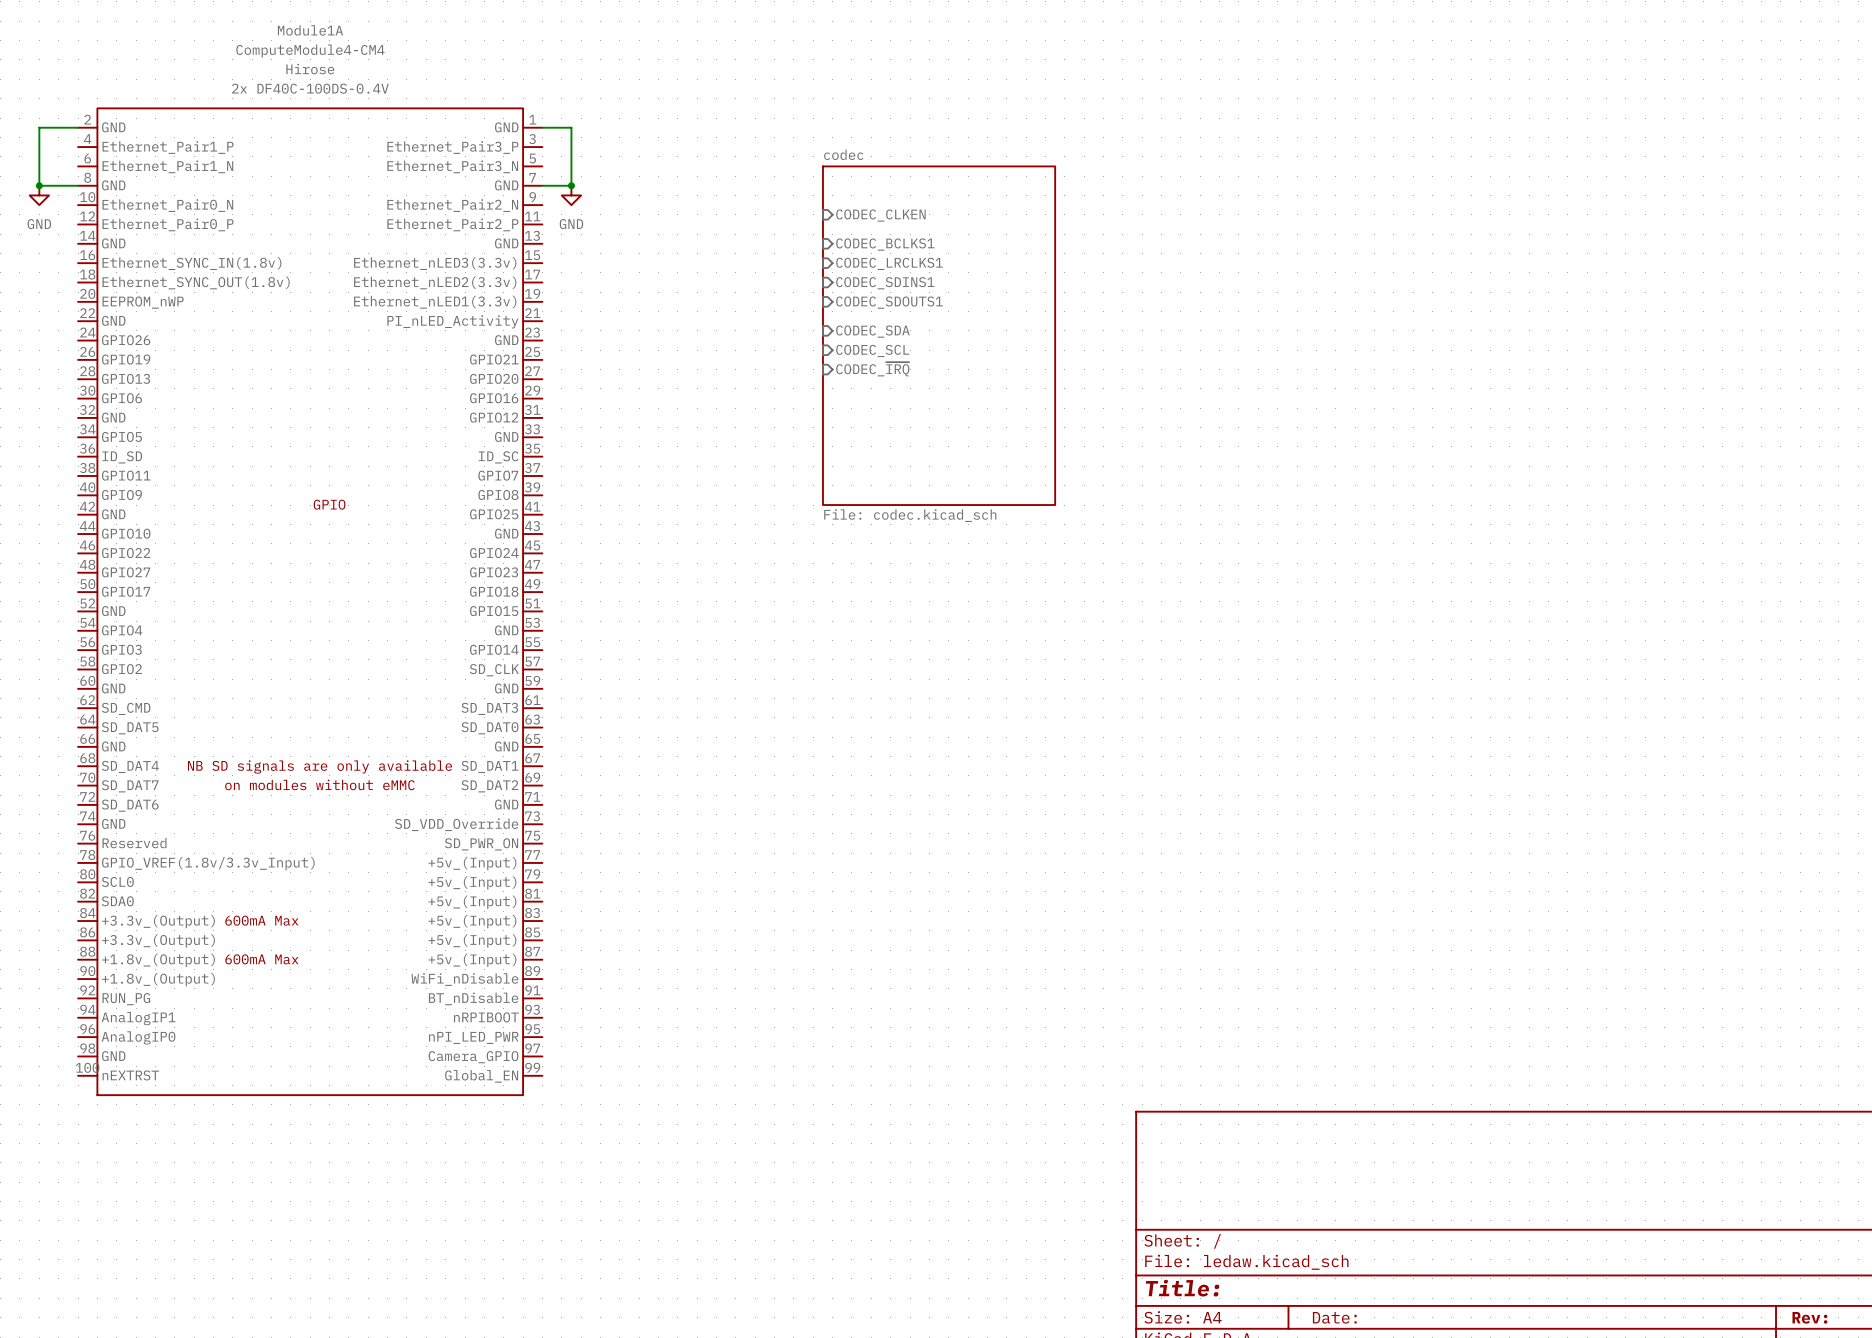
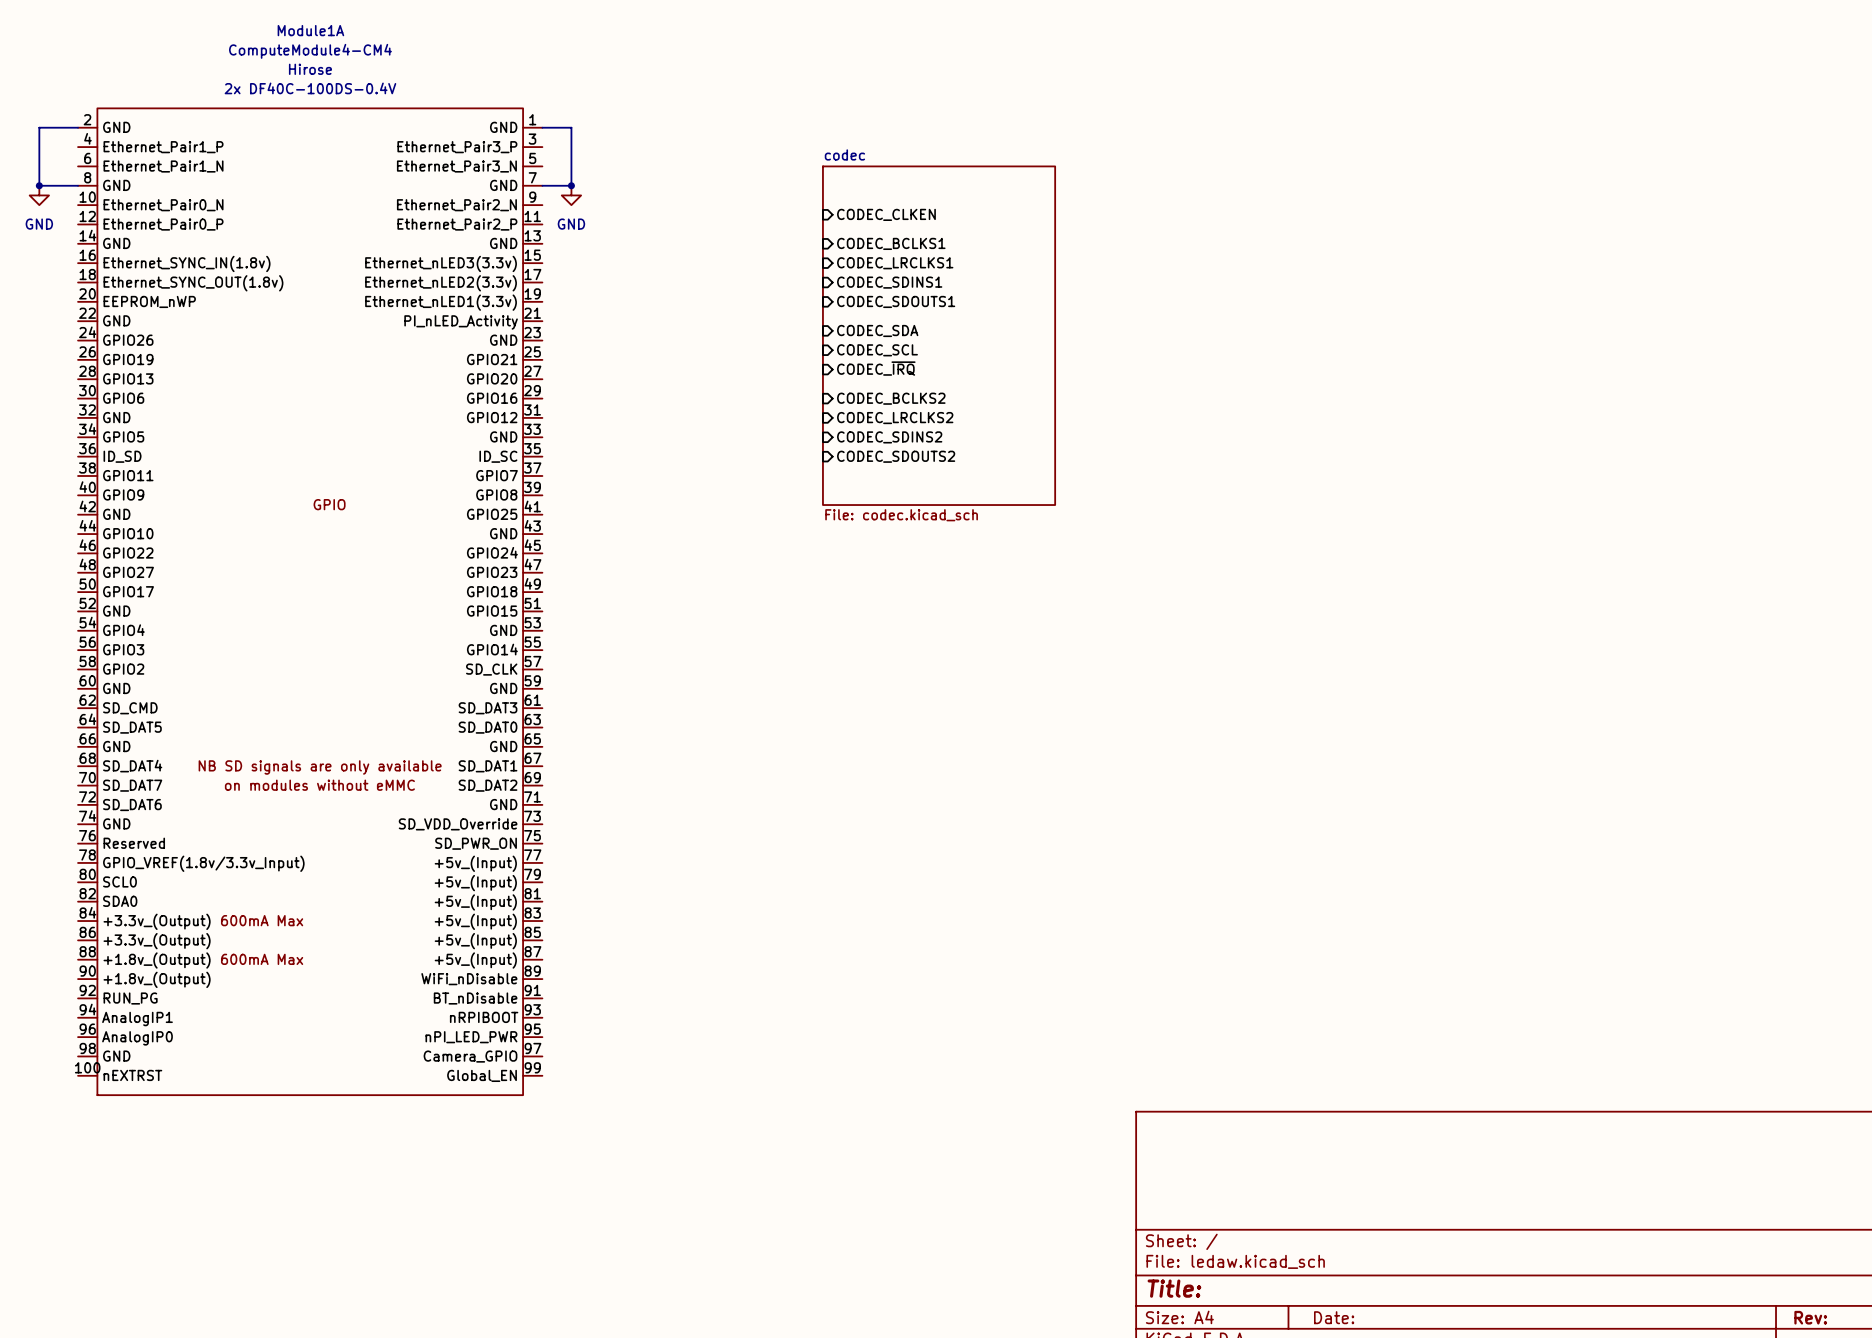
sheet pin: none -> CODEC_BCLKS2 (891, 398)
sheet pin: none -> CODEC_LRCLKS2 (895, 418)
sheet pin: none -> CODEC_SDINS2 (889, 437)
sheet pin: none -> CODEC_SDOUTS2 (896, 456)

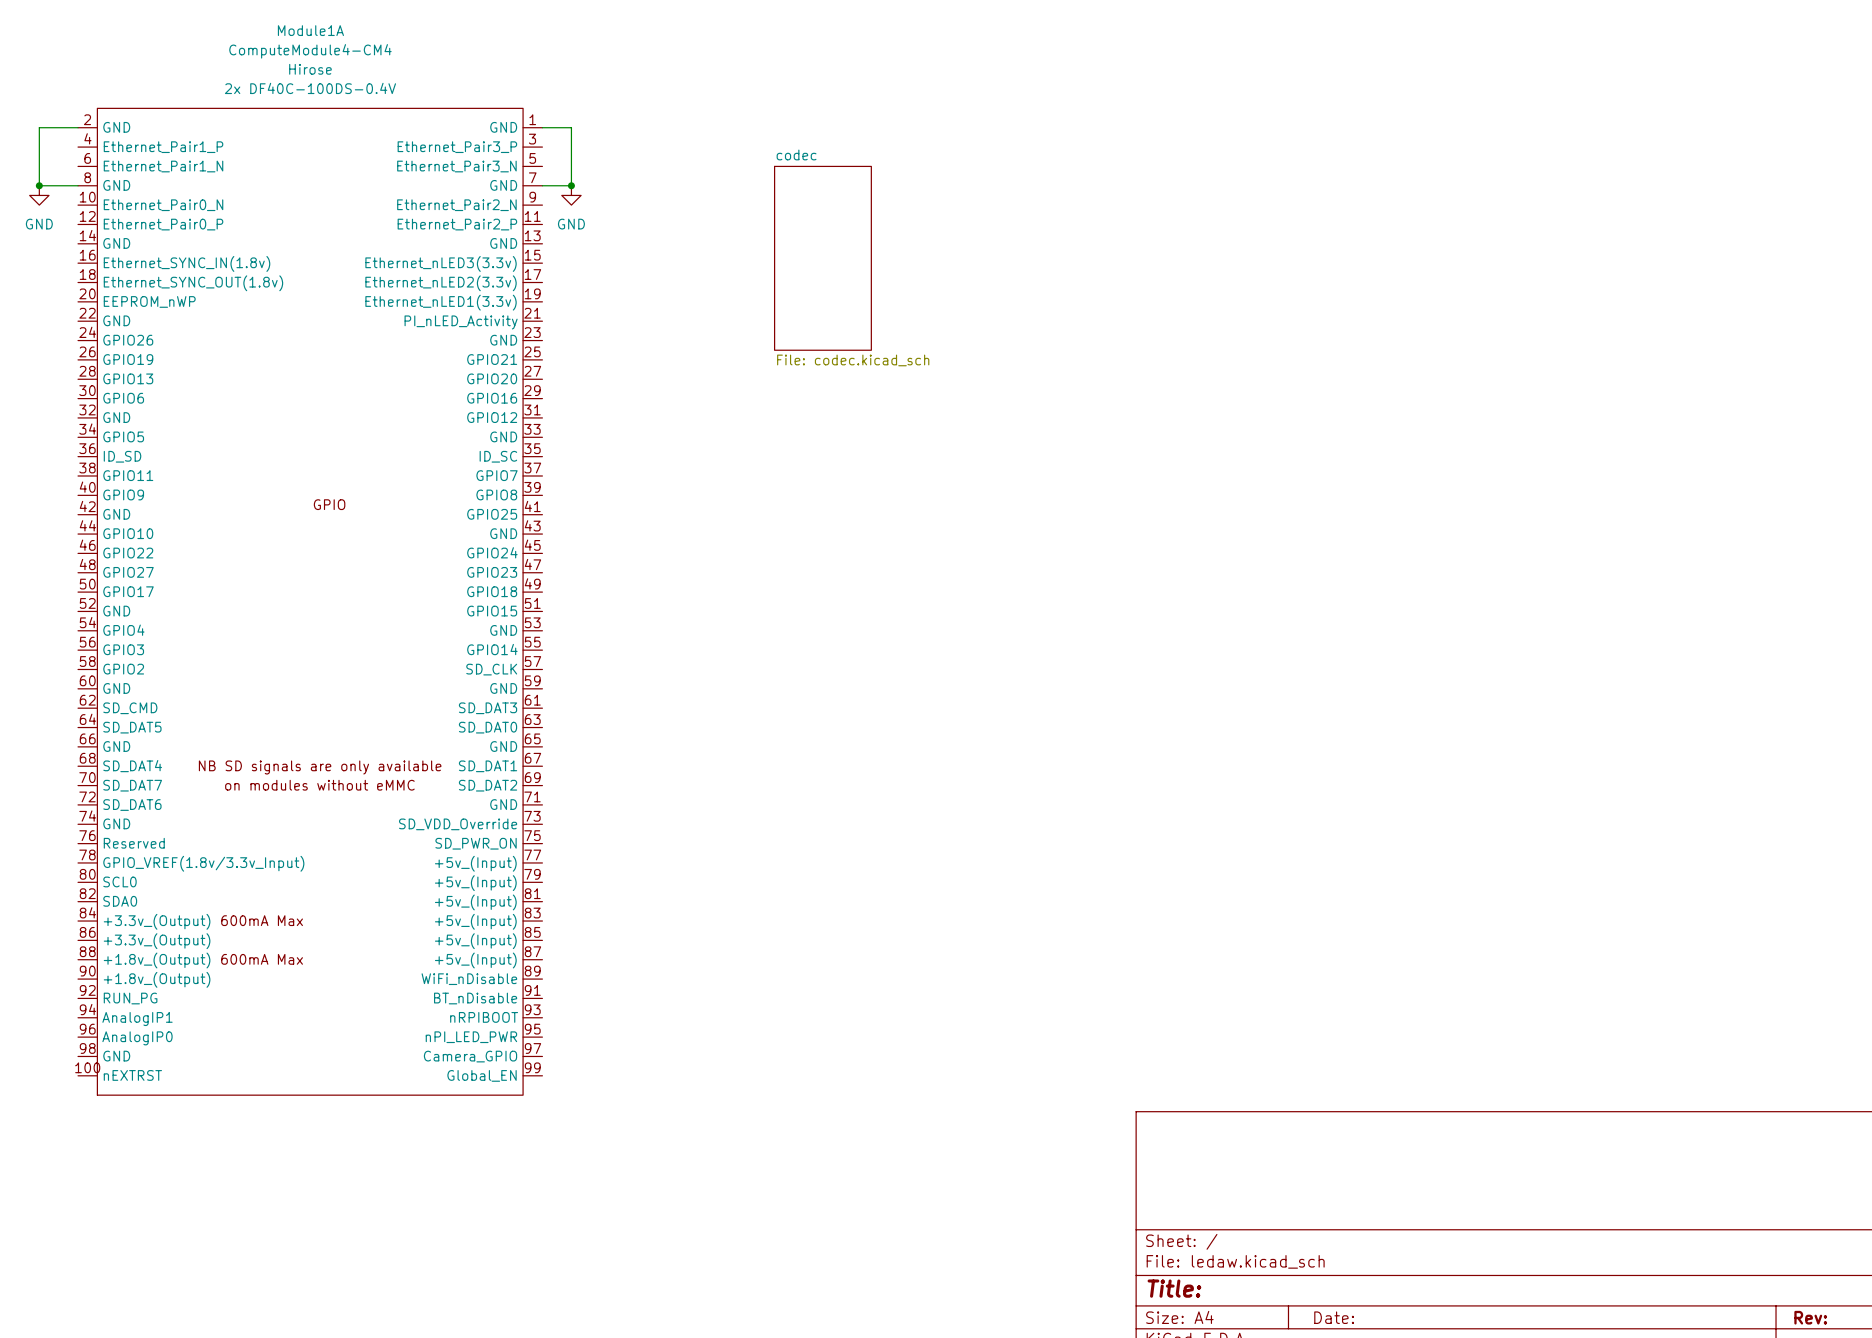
sheet pin: CODEC_CLKEN (886, 214) -> none
sheet pin: CODEC_BCLKS1 (891, 243) -> none
sheet codec: none -> File: codec.kicad_sch (822, 258)
sheet pin: CODEC_LRCLKS1 (895, 263) -> none
sheet pin: CODEC_SDINS1 (889, 282) -> none
sheet pin: CODEC_SDOUTS1 (896, 301) -> none
sheet pin: CODEC_SDA (877, 330) -> none
sheet codec: File: codec.kicad_sch (939, 335) -> none
sheet pin: CODEC_SCL (877, 350) -> none
sheet pin: CODEC_~{IRQ} (876, 368) -> none
sheet pin: CODEC_BCLKS2 (891, 398) -> none
sheet pin: CODEC_LRCLKS2 (895, 418) -> none
sheet pin: CODEC_SDINS2 (889, 437) -> none
sheet pin: CODEC_SDOUTS2 (896, 456) -> none

